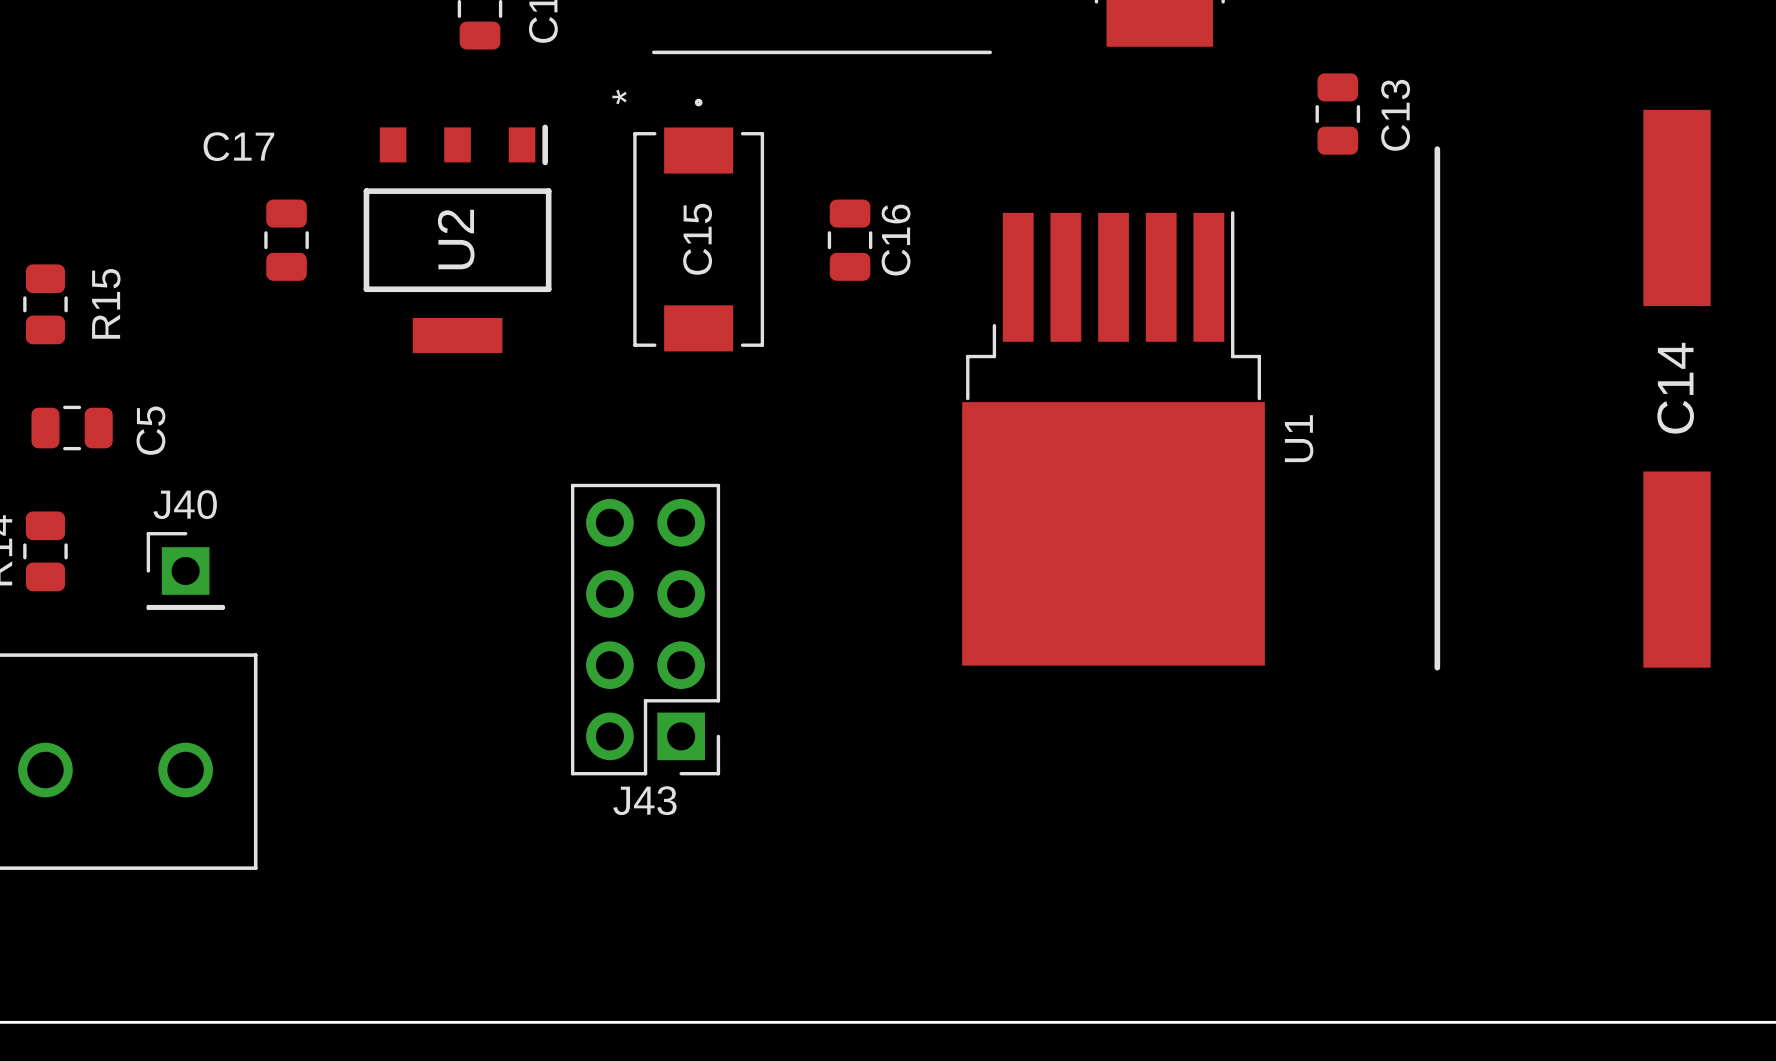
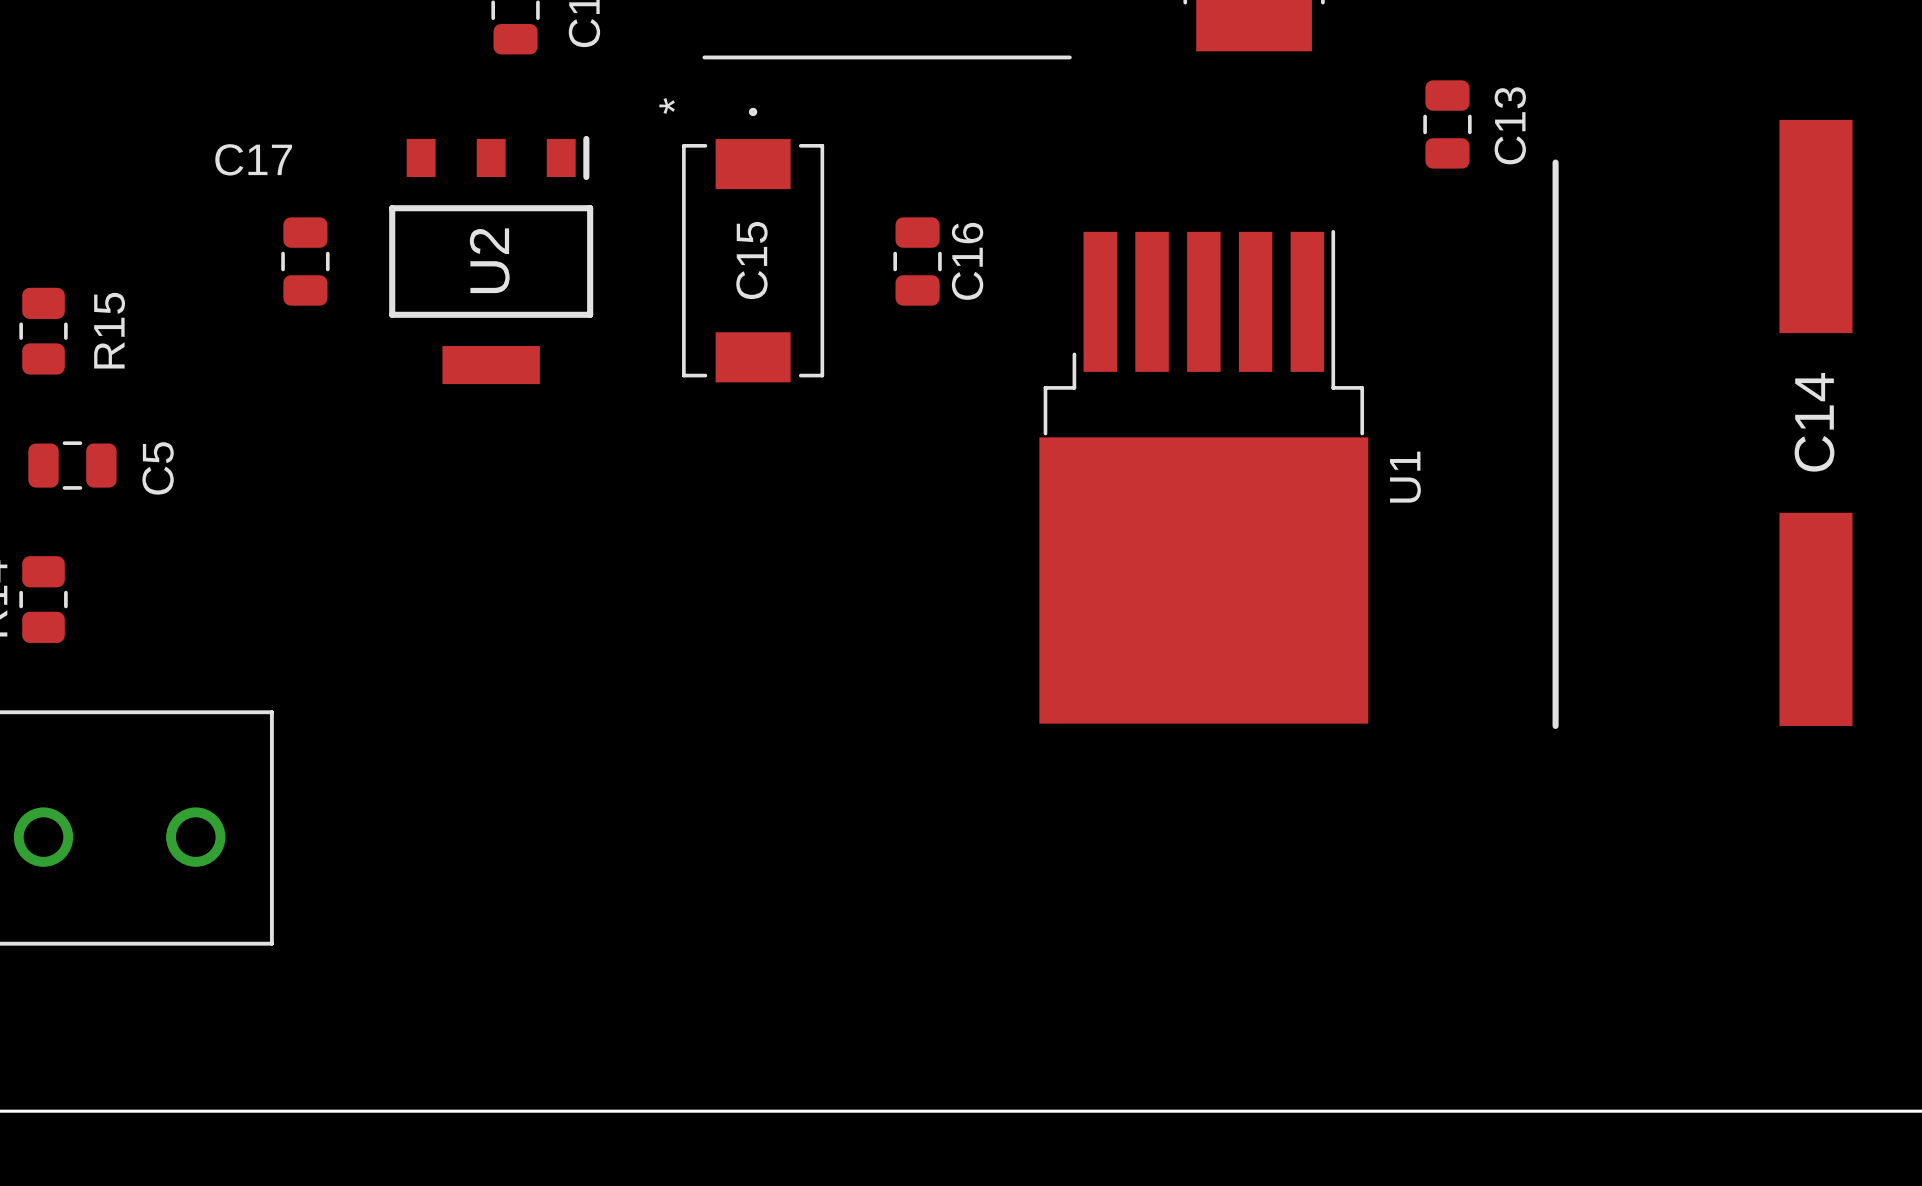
J40: (185, 570) -> none
J43: (645, 629) -> none

